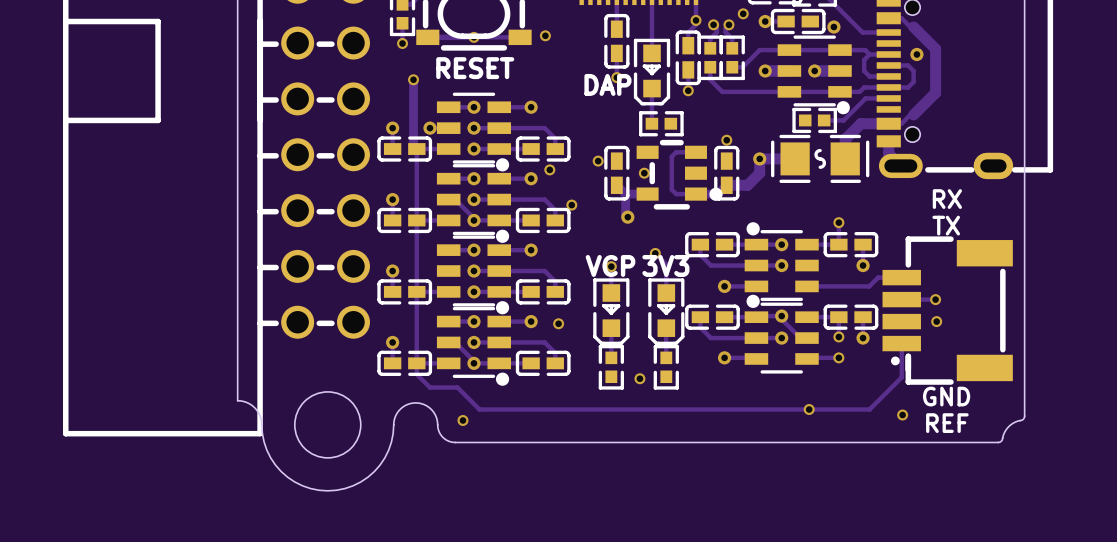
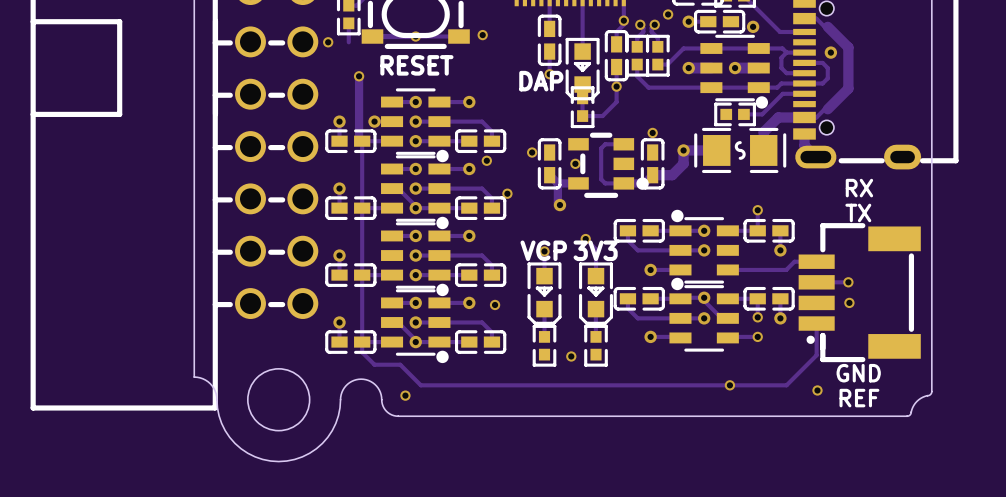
via position: (402, 43) -> (328, 42)
track: none -> (616, 86) (616, 102) (602, 116) (582, 116)
part rotation: 0° (661, 123) -> 90° clockwise (582, 107)

